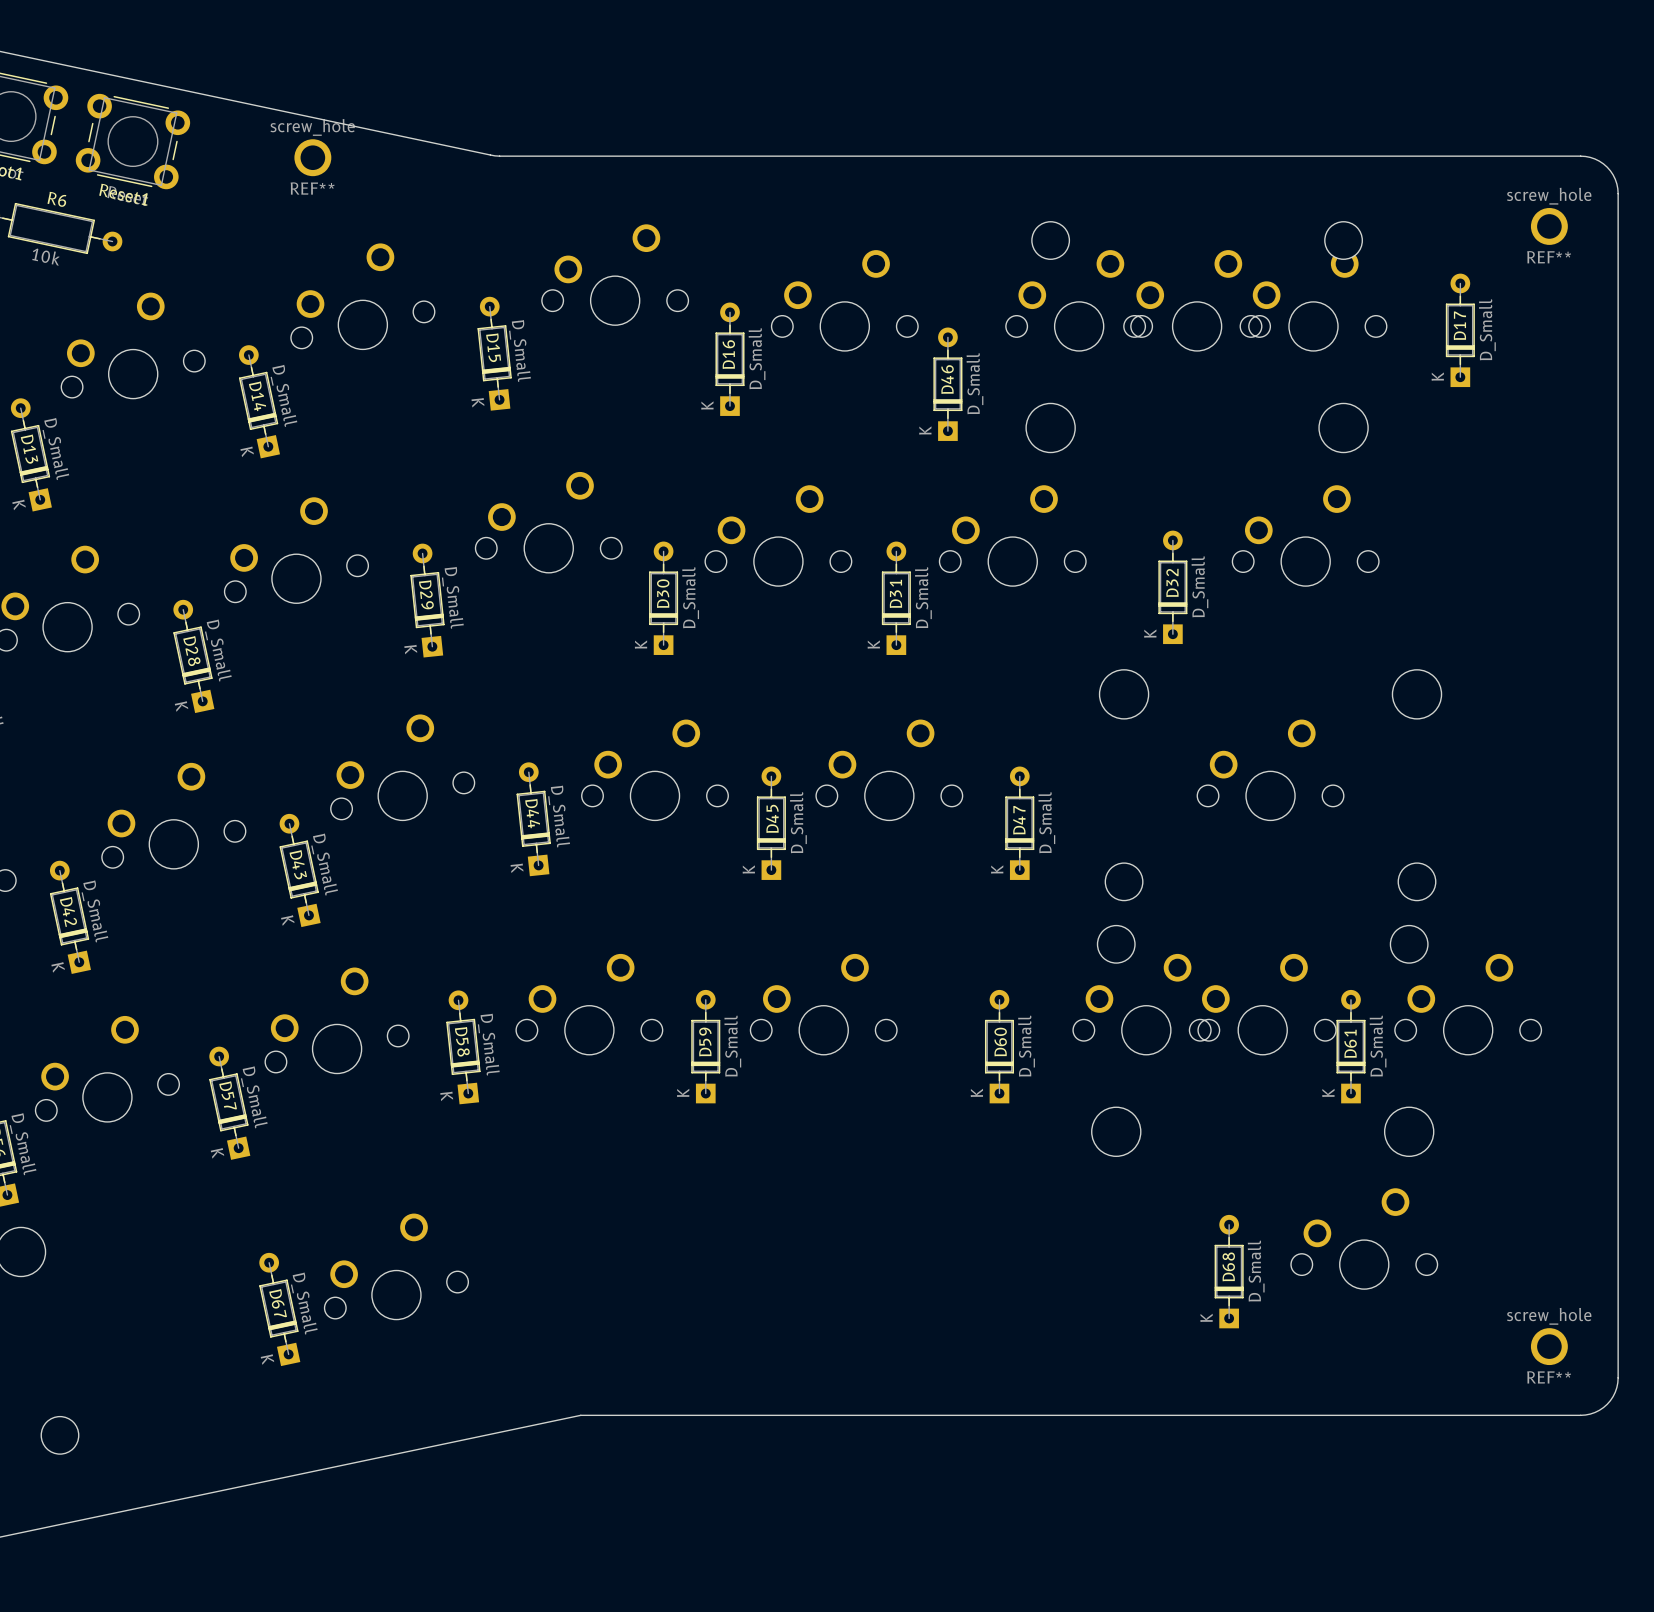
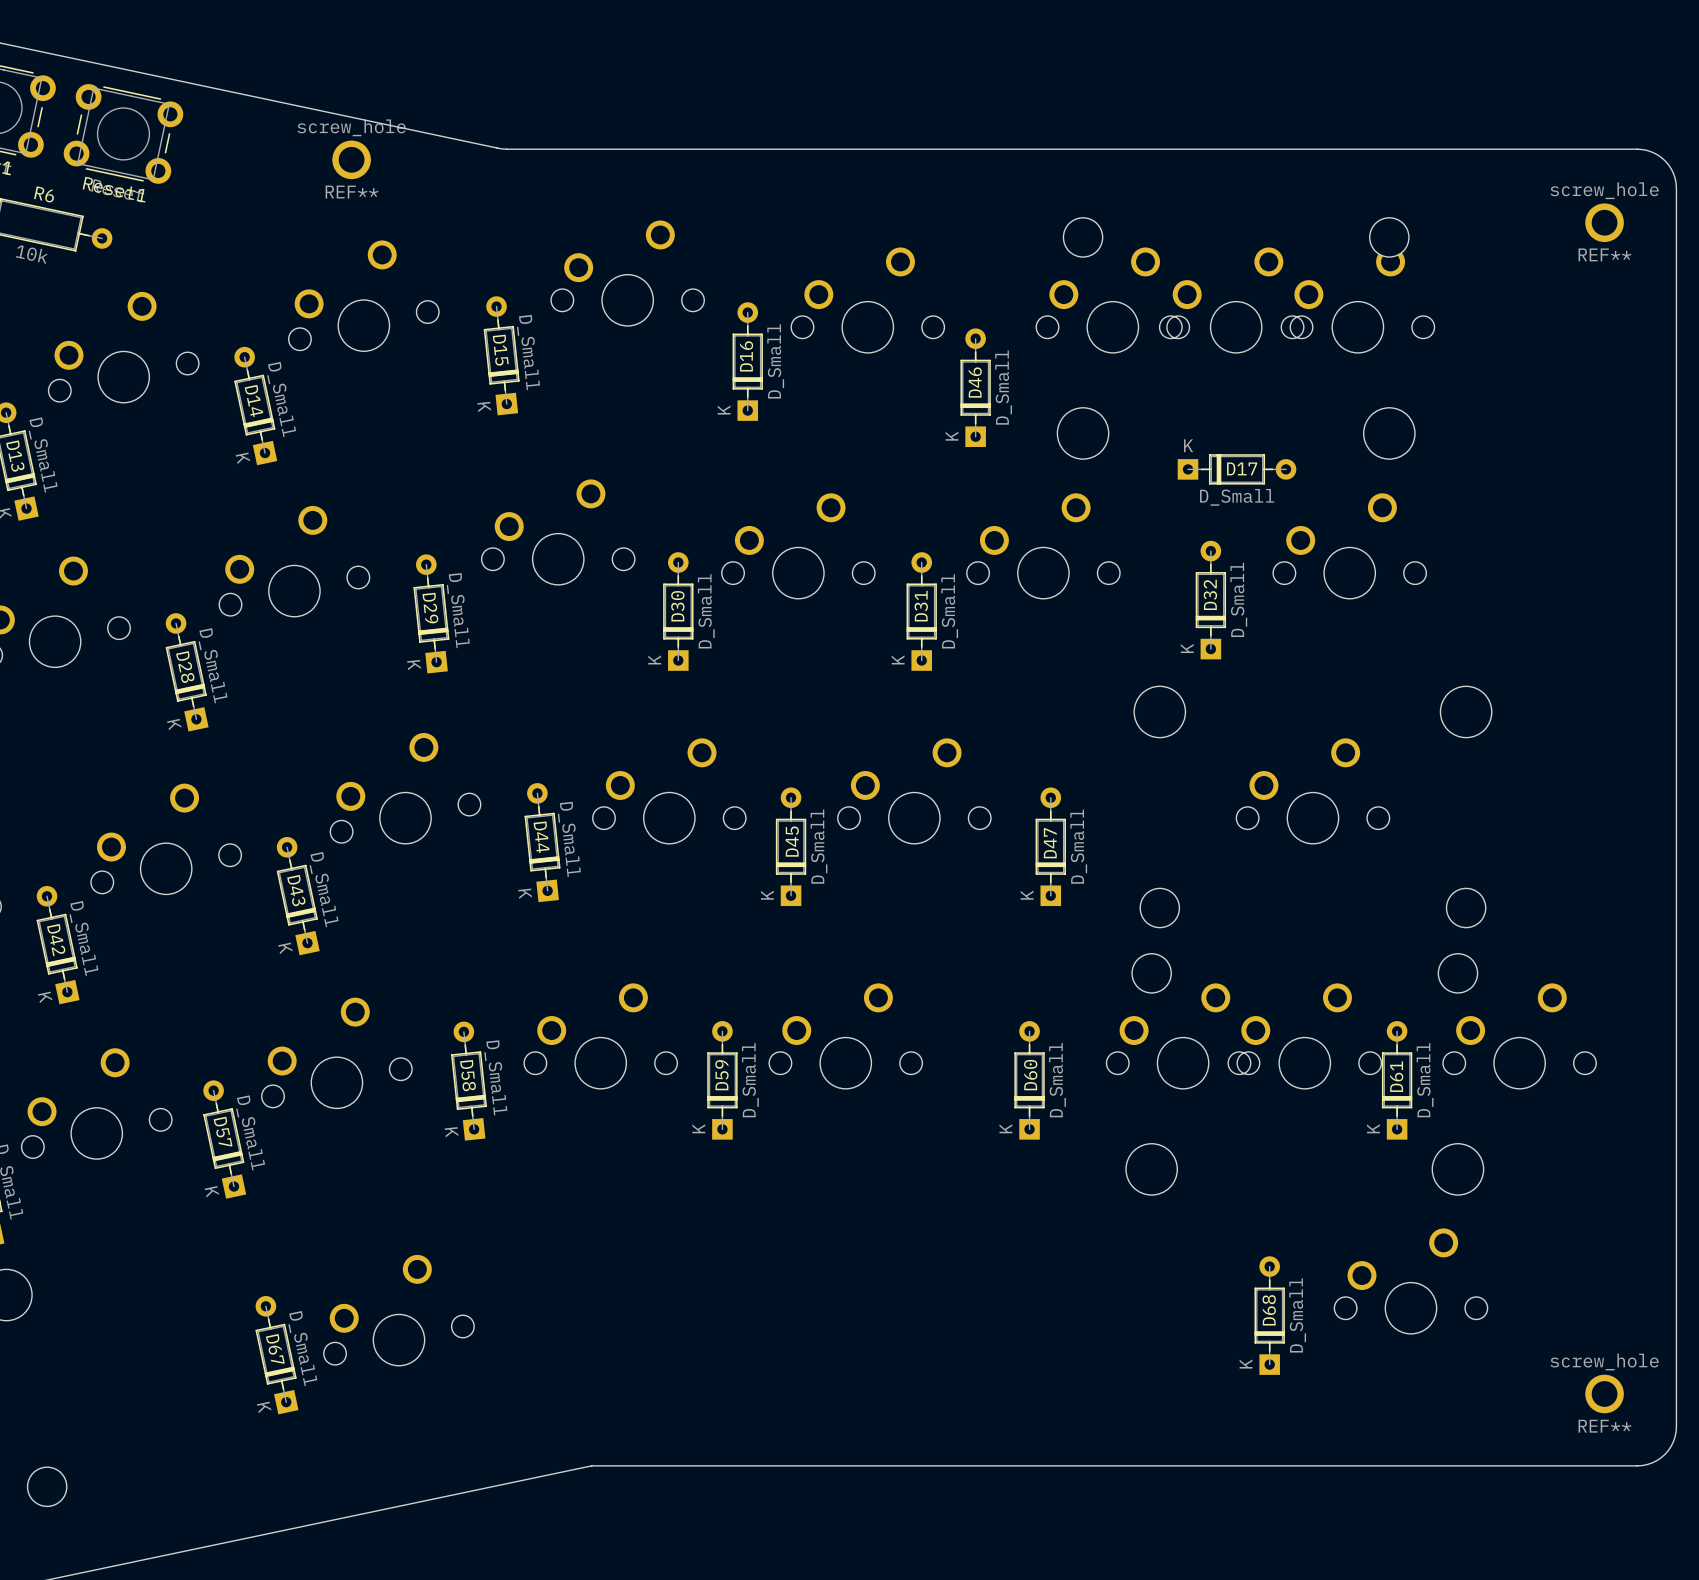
REF** position: (312, 157) -> (351, 159)
D17 rotation: 0° (1460, 330) -> 90° clockwise (1237, 469)
D17 position: (1460, 330) -> (1237, 469)

